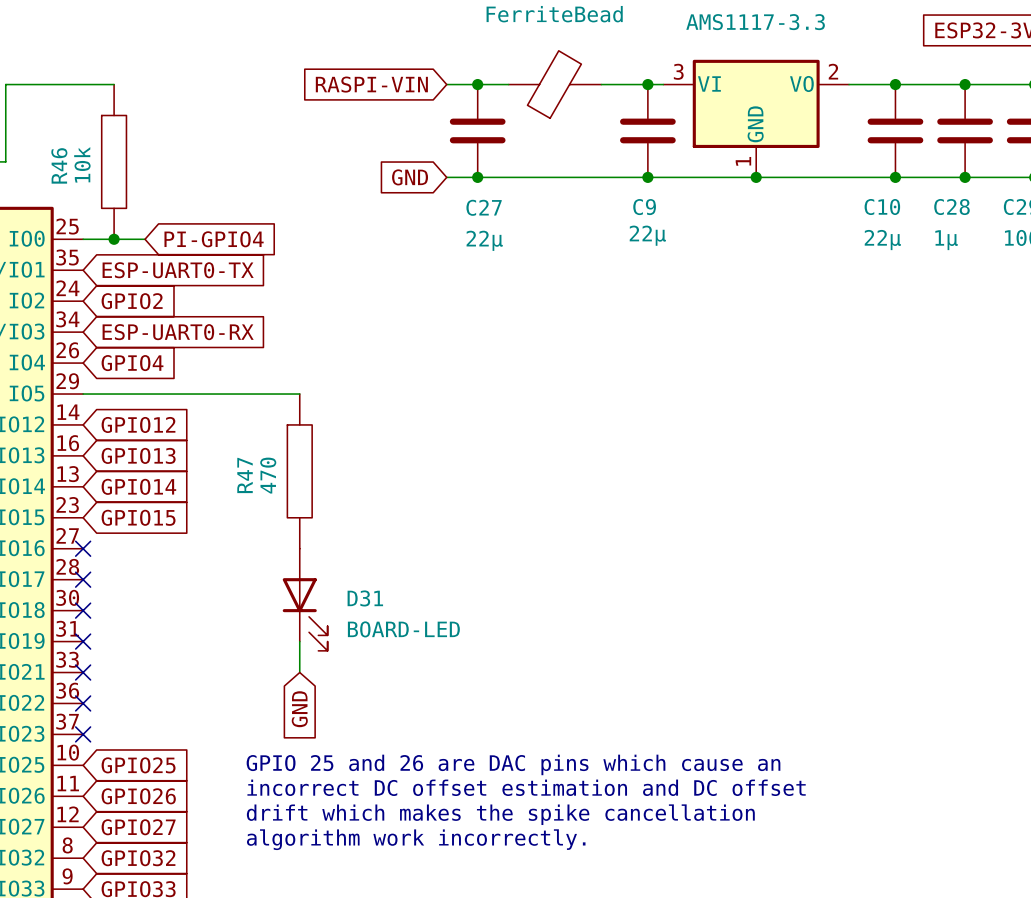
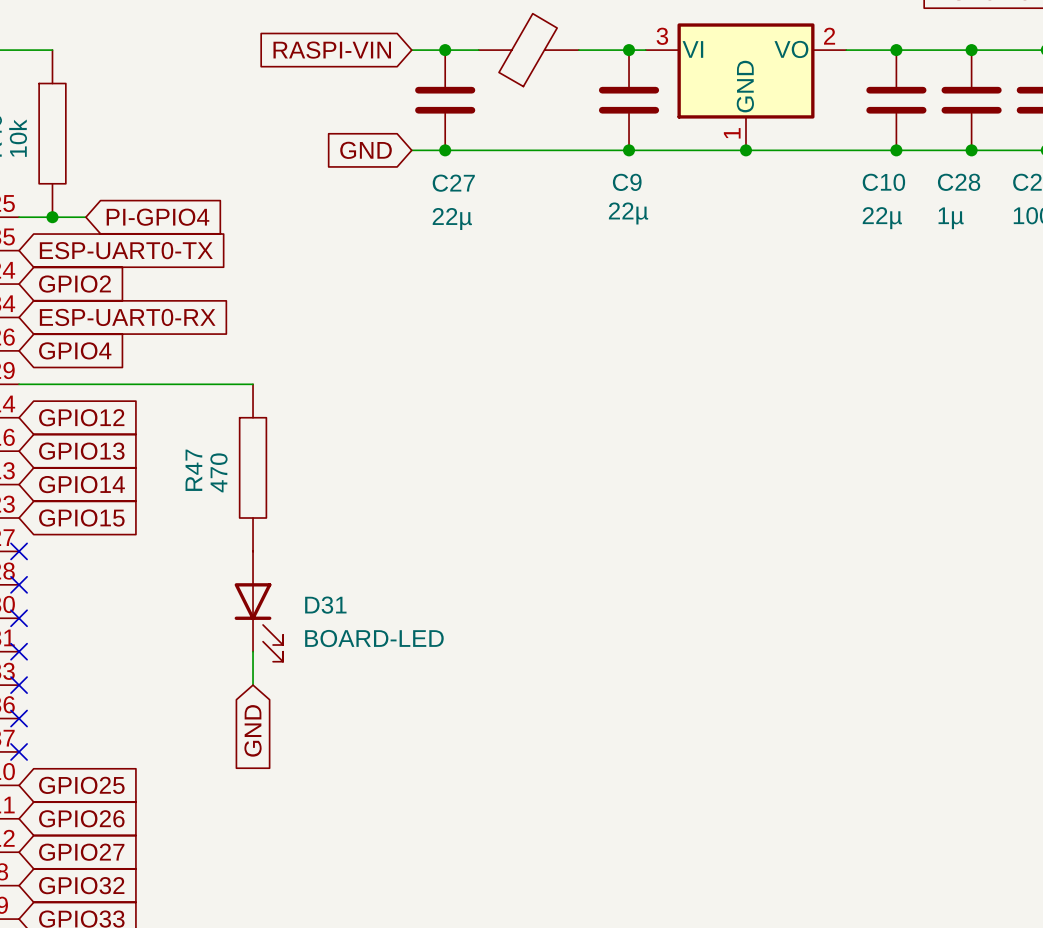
text: GPIO 25 and 26 are DAC pins which cause an (513, 764) -> none
text: incorrect DC offset estimation and DC offset (526, 787) -> none
text: drift which makes the spike cancellation (500, 814) -> none
text: algorithm work incorrectly. (416, 839) -> none

